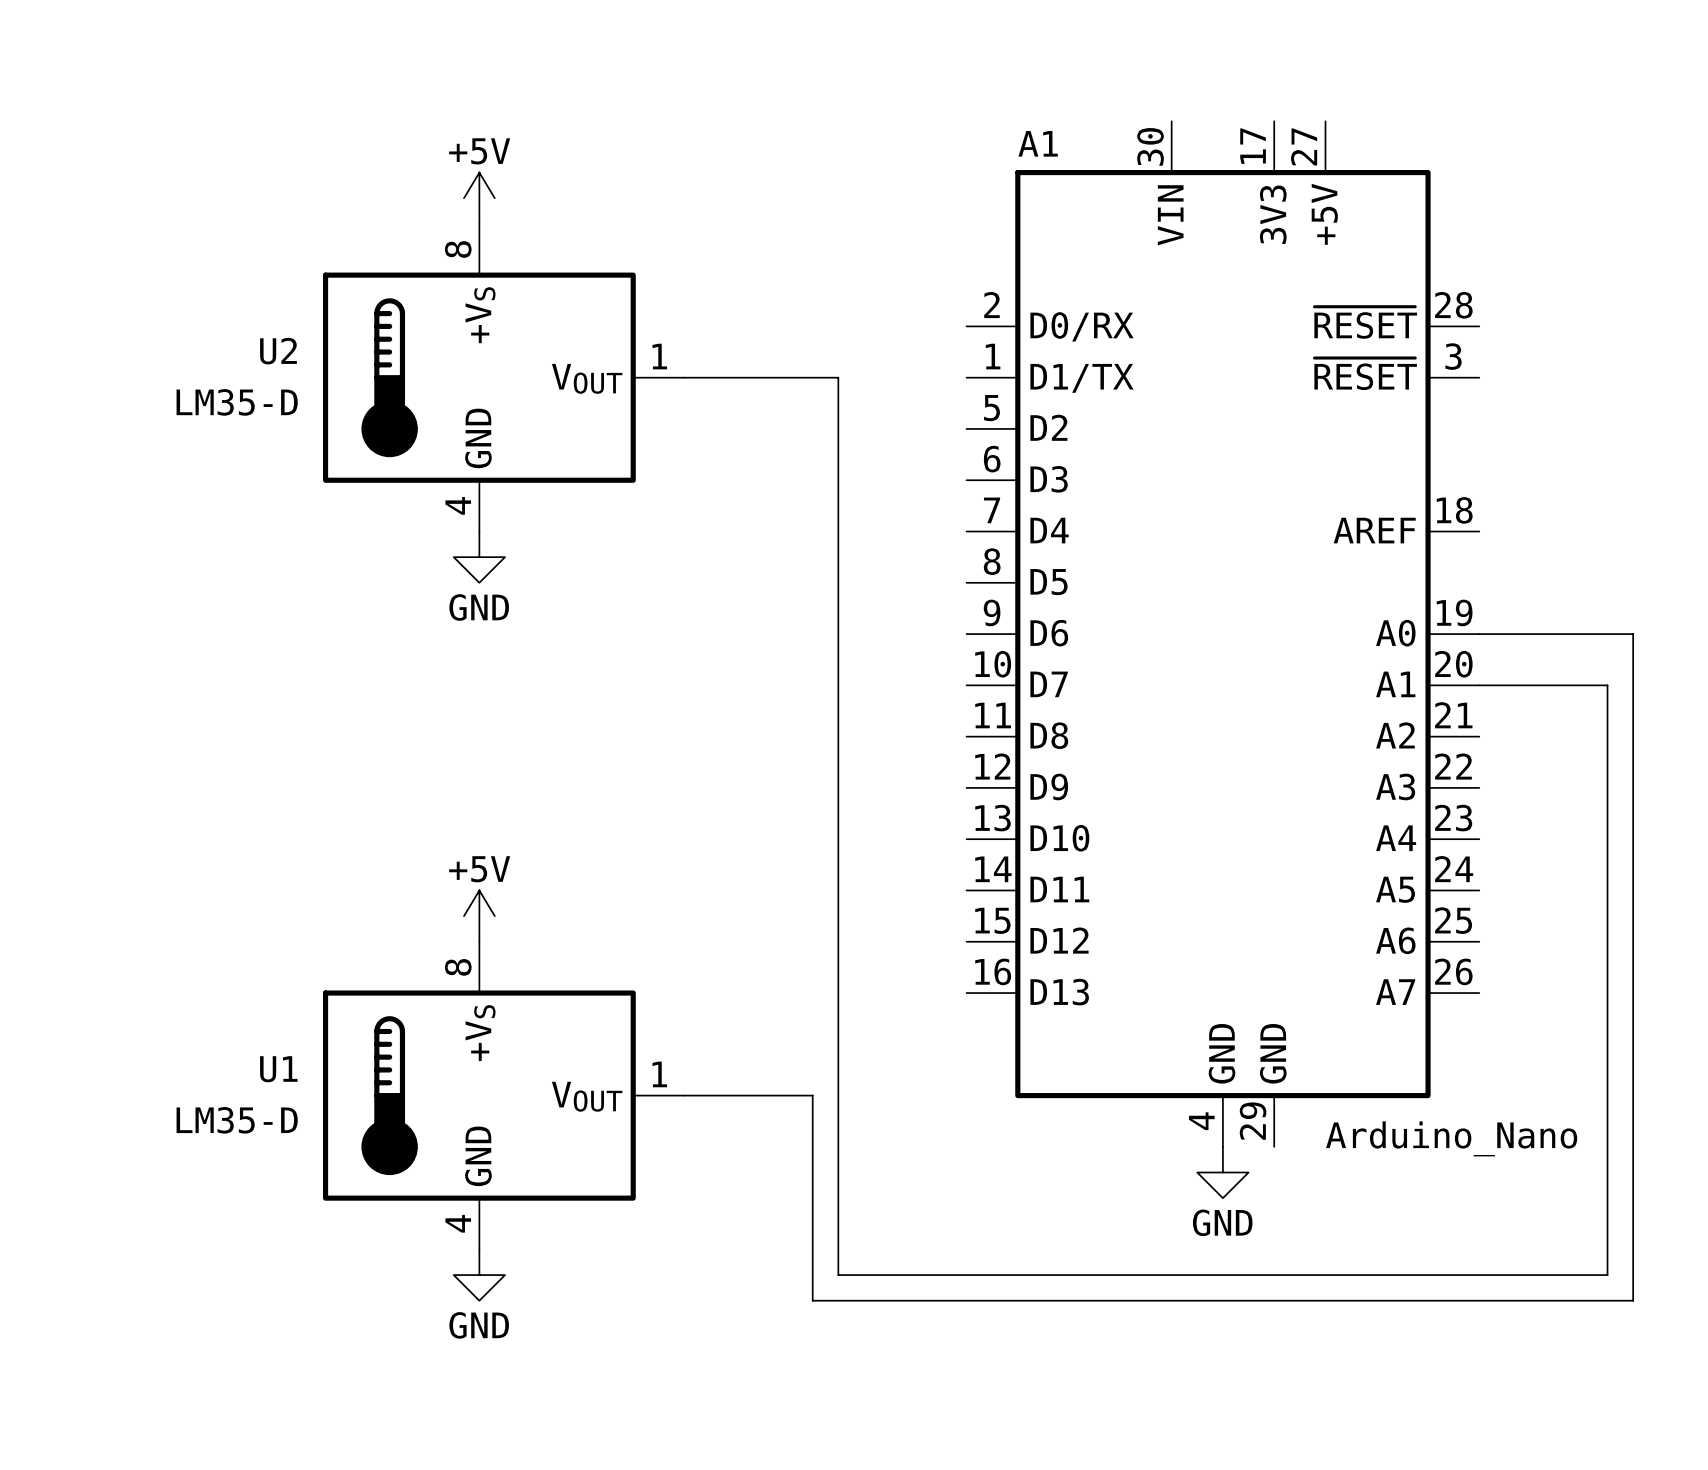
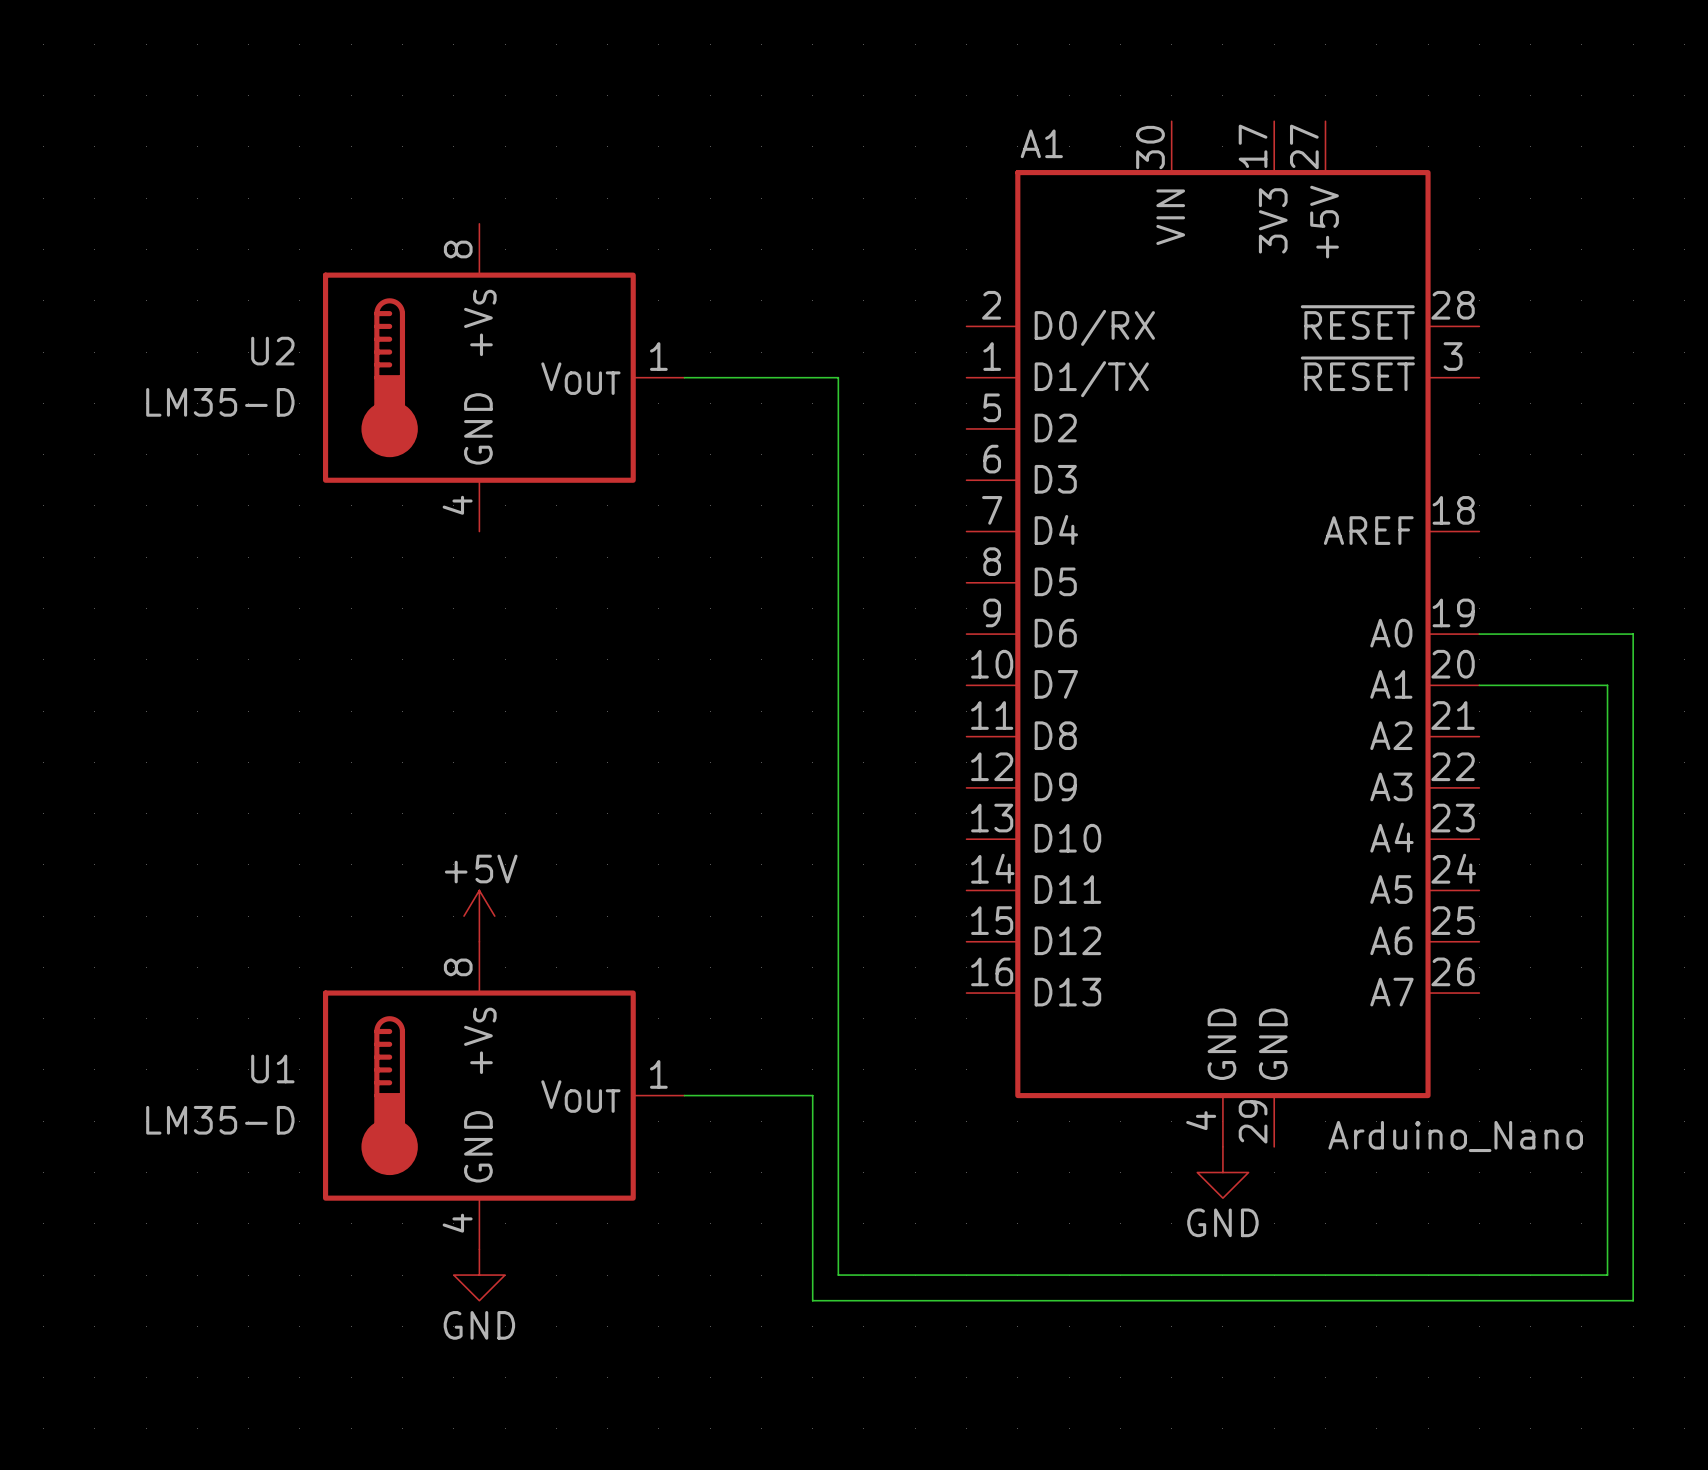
power symbol: +5V (479, 198) -> none
power symbol: GND (479, 557) -> none

